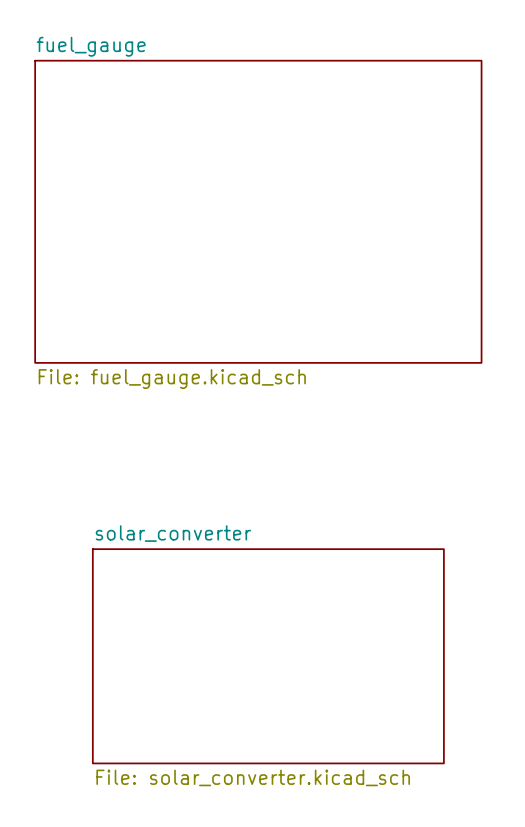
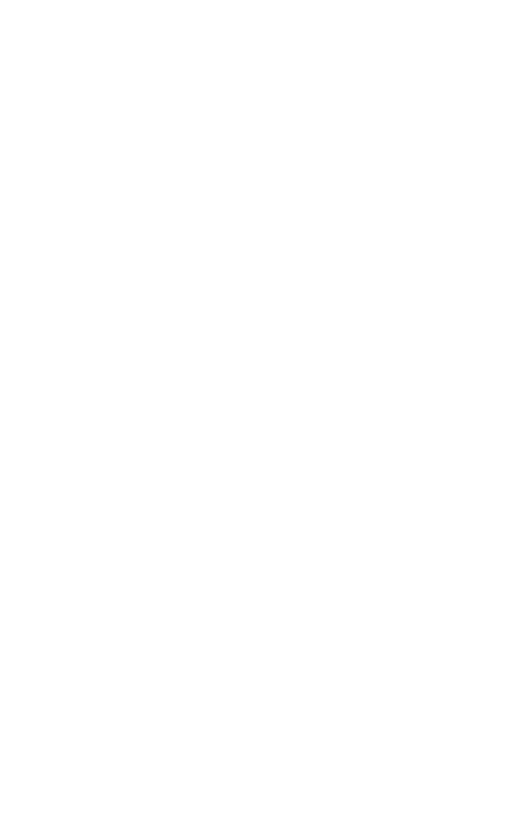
sheet fuel_gauge: File: fuel_gauge.kicad_sch (258, 211) -> none
sheet solar_converter: File: solar_converter.kicad_sch (268, 656) -> none

